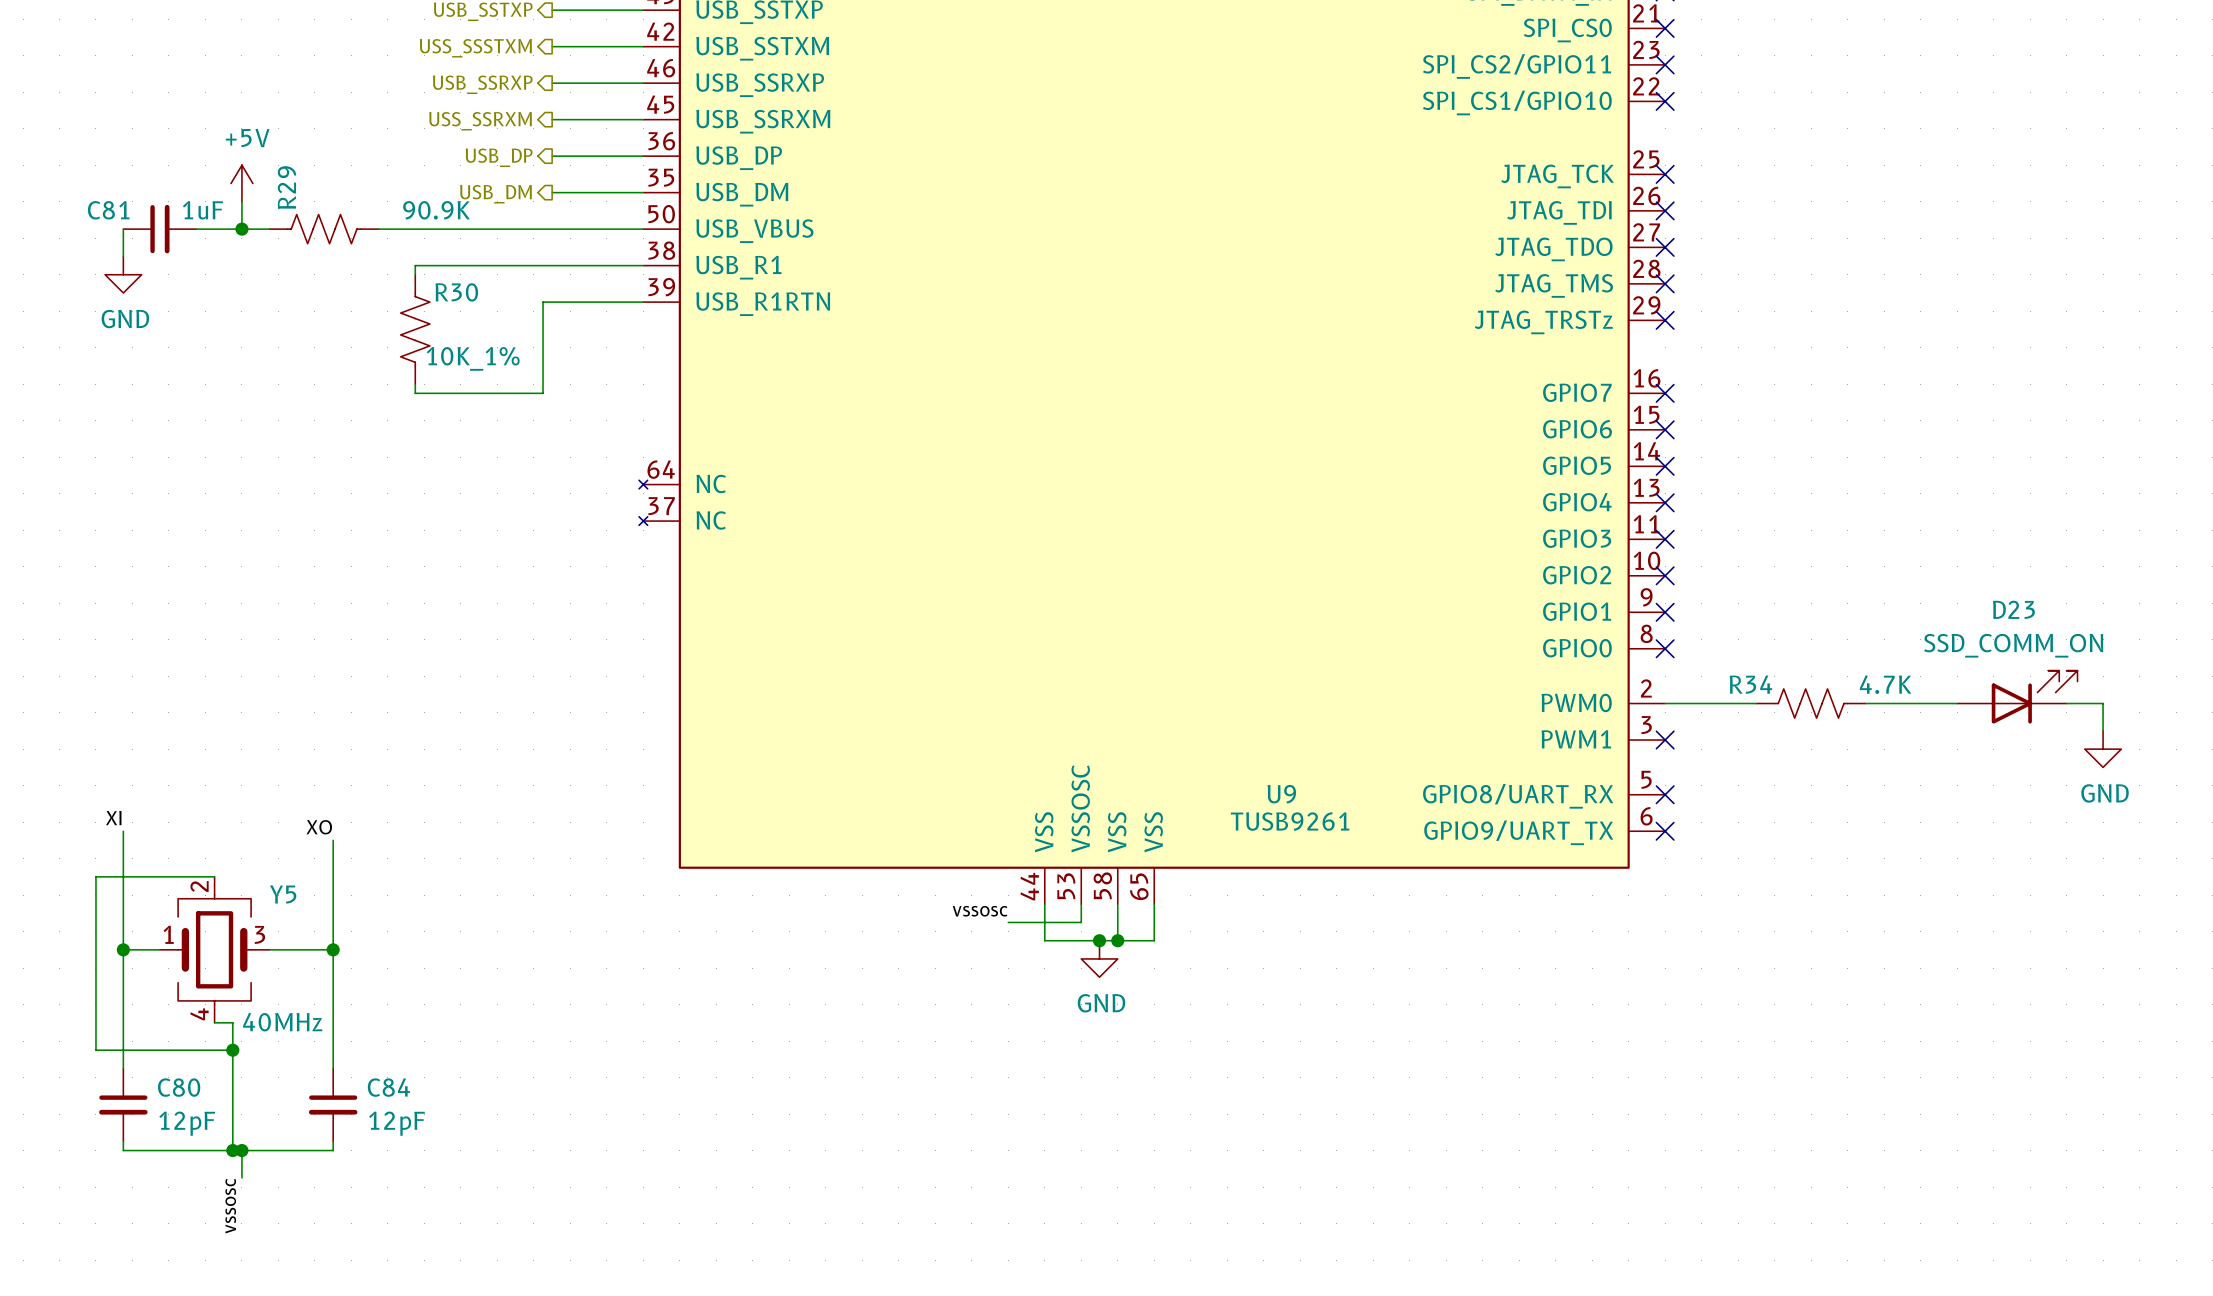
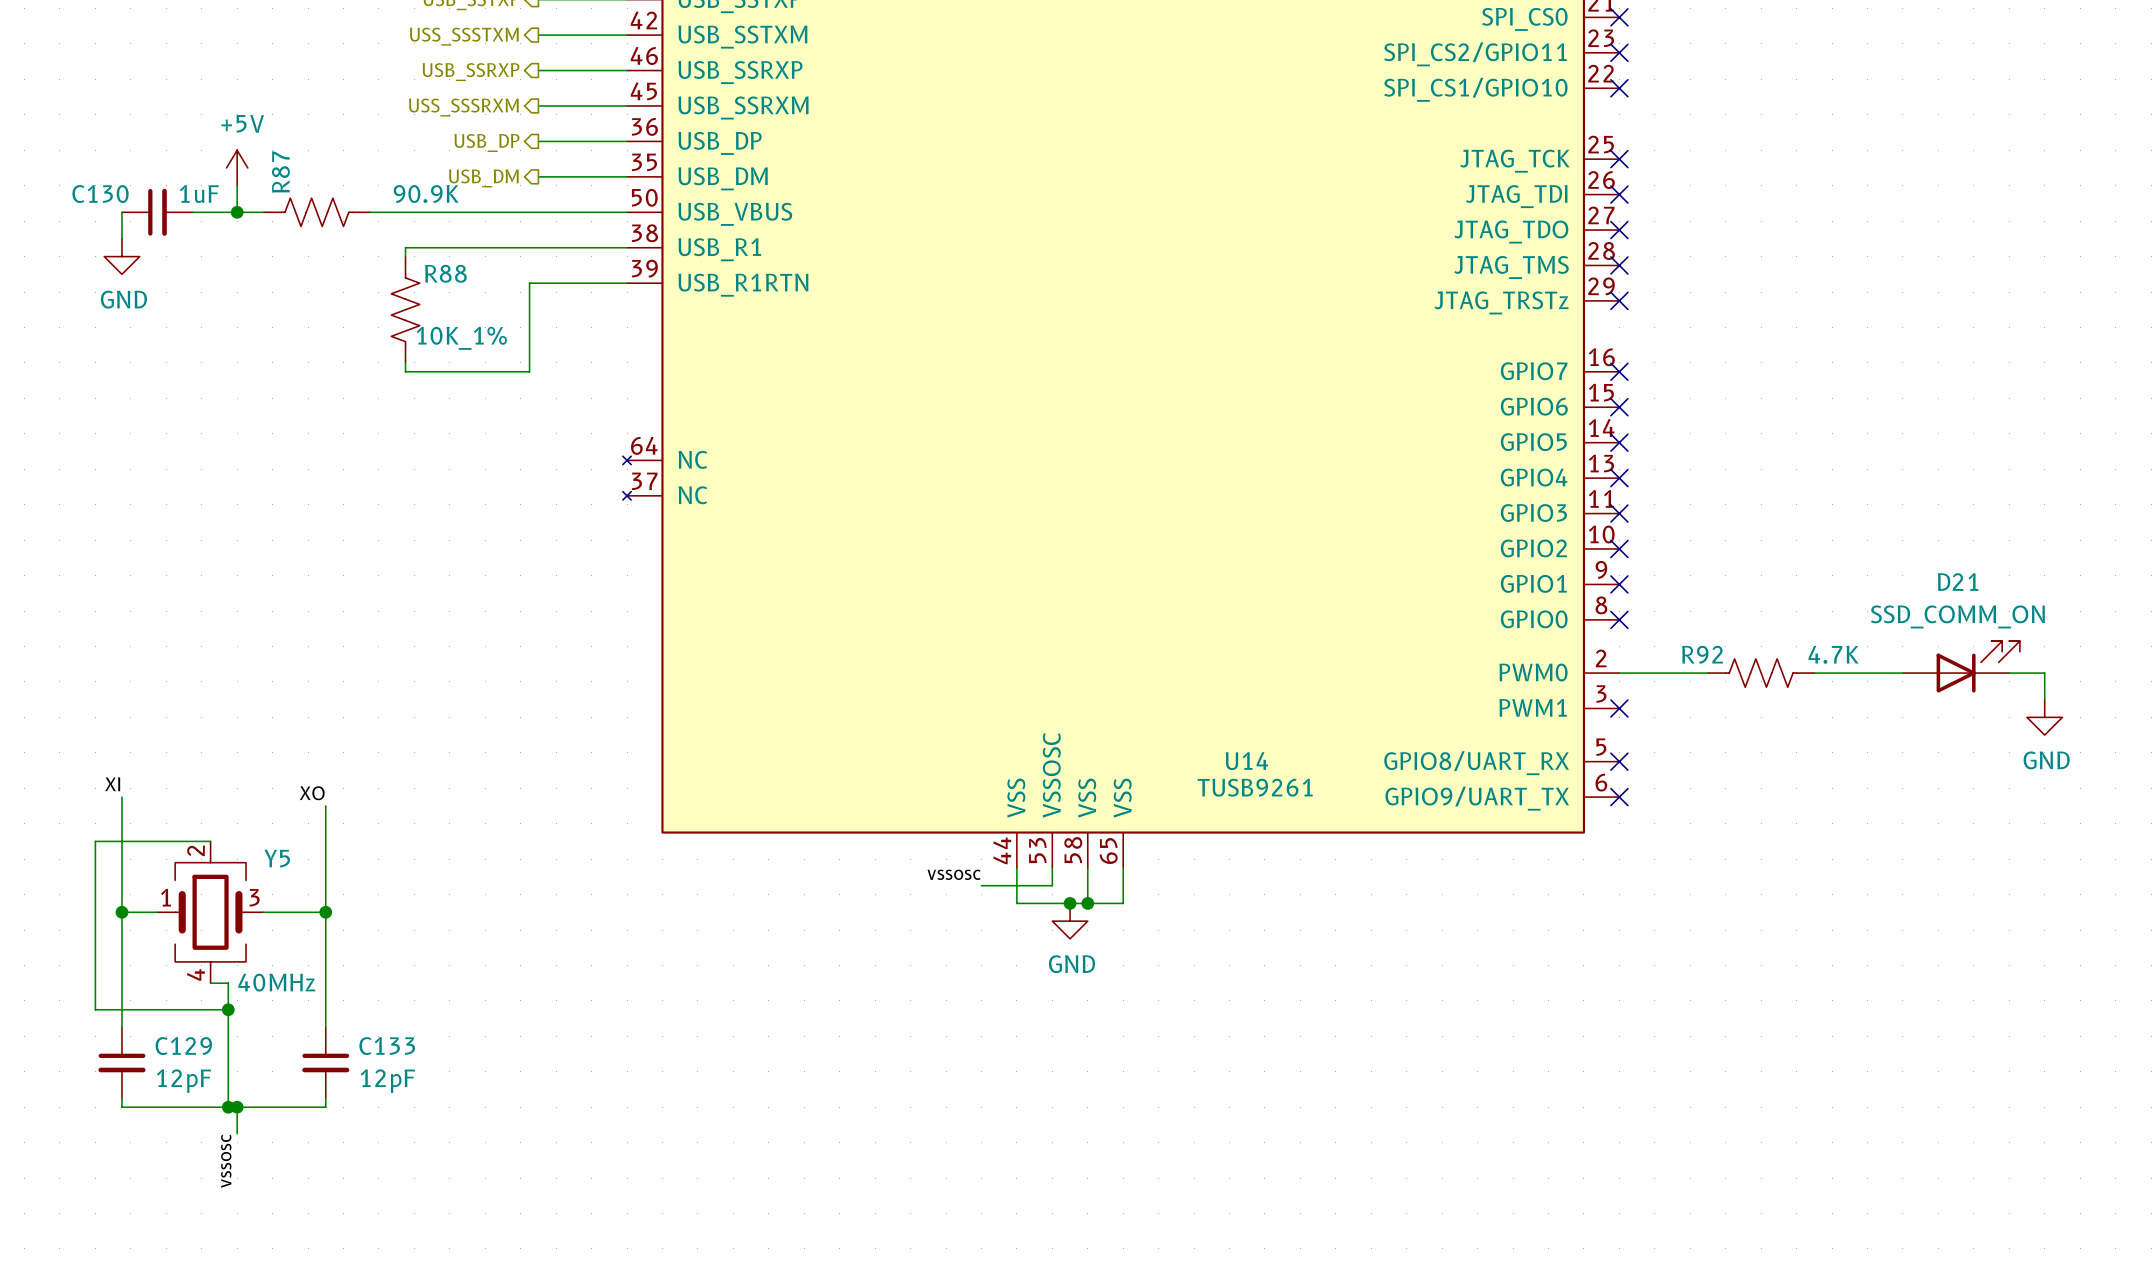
hierarchical label: USS_SSRXM (480, 121) -> USS_SSSRXM (463, 107)
R29 name: R29 (287, 187) -> R87 (280, 172)
C81 name: C81 (108, 210) -> C130 (100, 194)
R30 name: R30 (456, 292) -> R88 (445, 273)
D23 name: D23 (2013, 609) -> D21 (1958, 582)
R34 name: R34 (1750, 684) -> R92 (1702, 654)
U9 name: U9 (1281, 794) -> U14 (1246, 761)
C80 name: C80 (179, 1087) -> C129 (183, 1046)
C84 name: C84 (388, 1087) -> C133 (387, 1046)

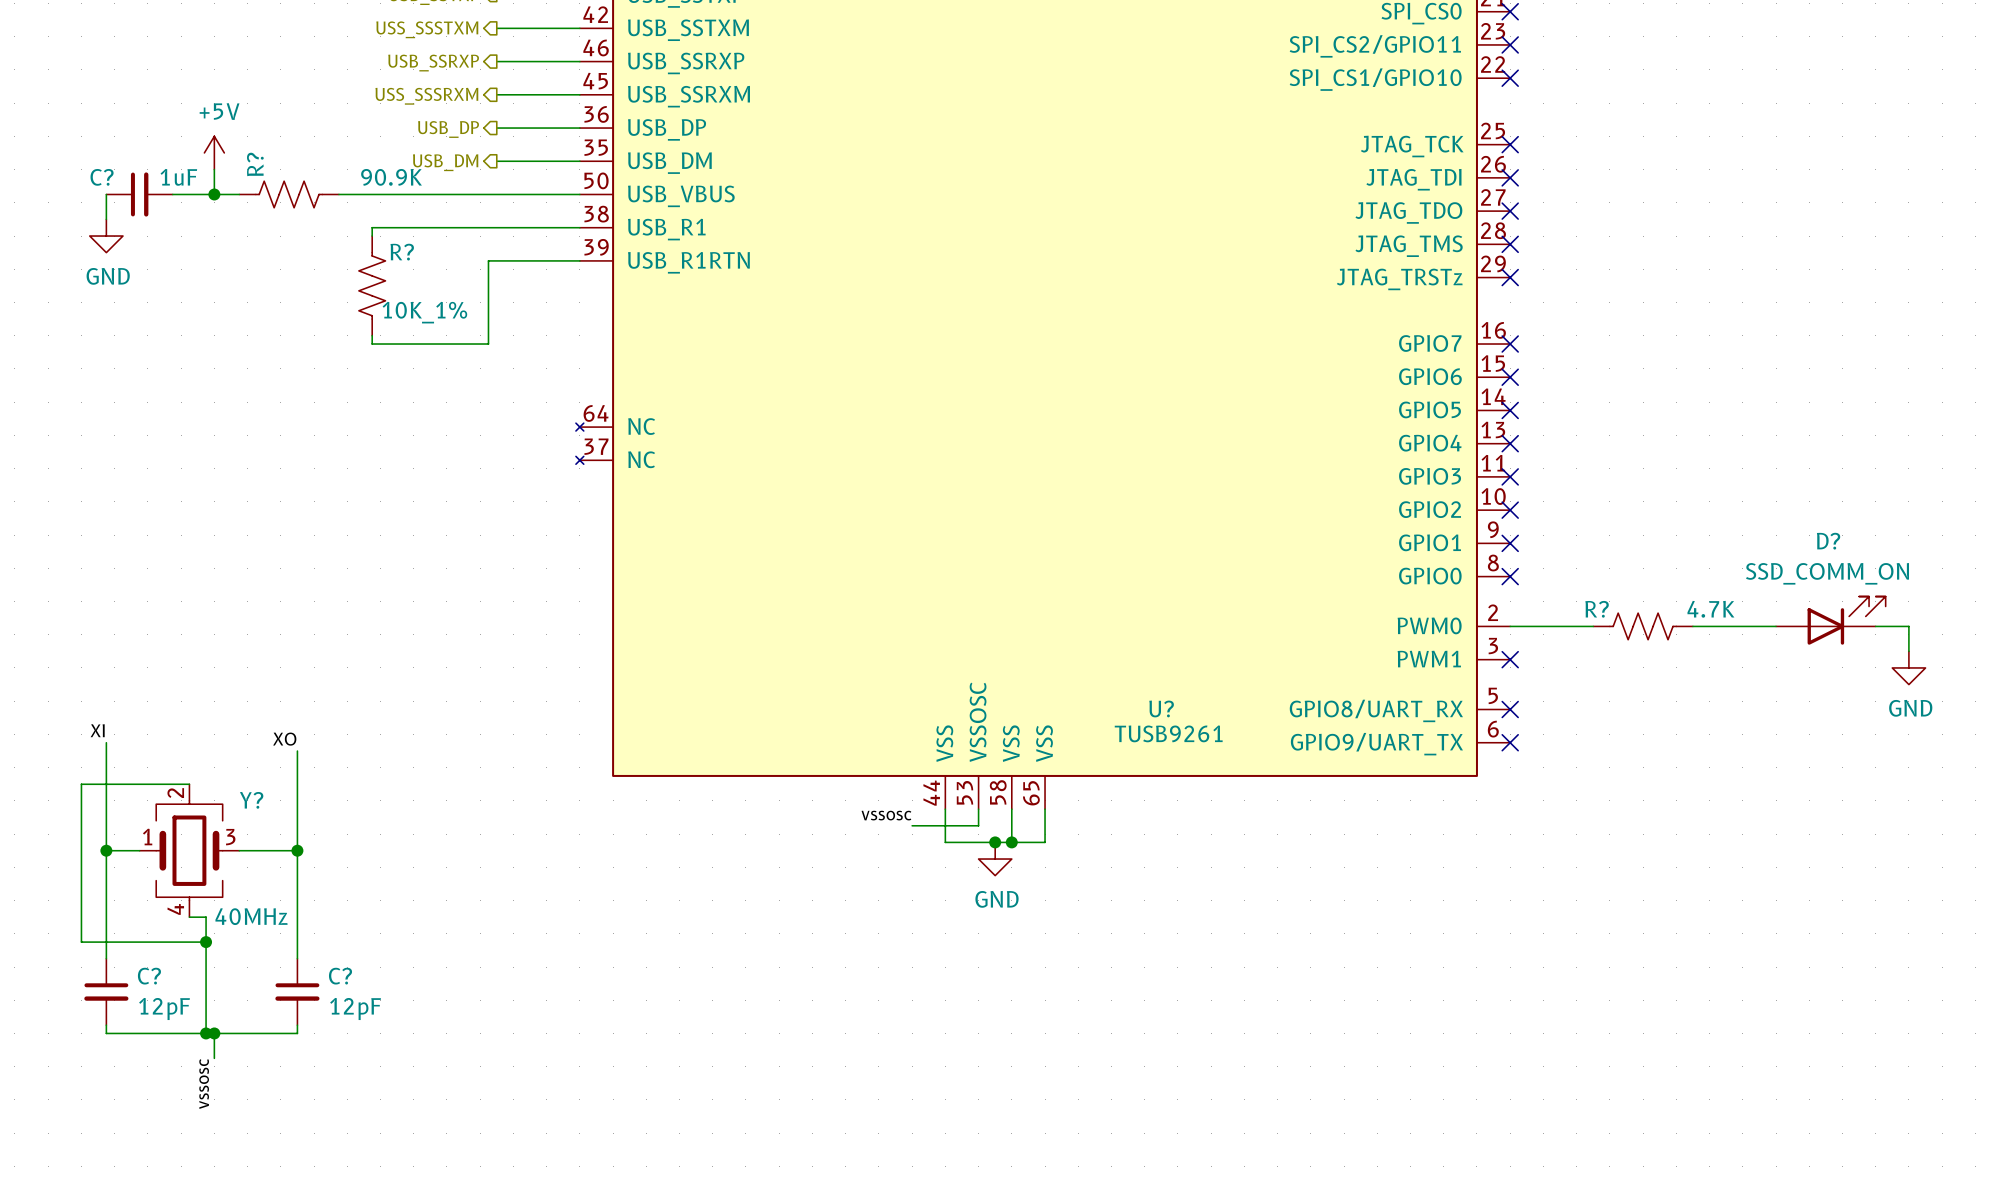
R87 name: R87 (280, 172) -> R? (255, 164)
C130 name: C130 (100, 194) -> C? (102, 177)
R88 name: R88 (445, 273) -> R? (402, 252)
D21 name: D21 (1958, 582) -> D? (1828, 541)
R92 name: R92 (1702, 654) -> R? (1597, 609)
U14 name: U14 (1246, 761) -> U? (1161, 708)
Y5 name: Y5 (277, 858) -> Y? (251, 800)
C129 name: C129 (183, 1046) -> C? (149, 976)
C133 name: C133 (387, 1046) -> C? (340, 976)

